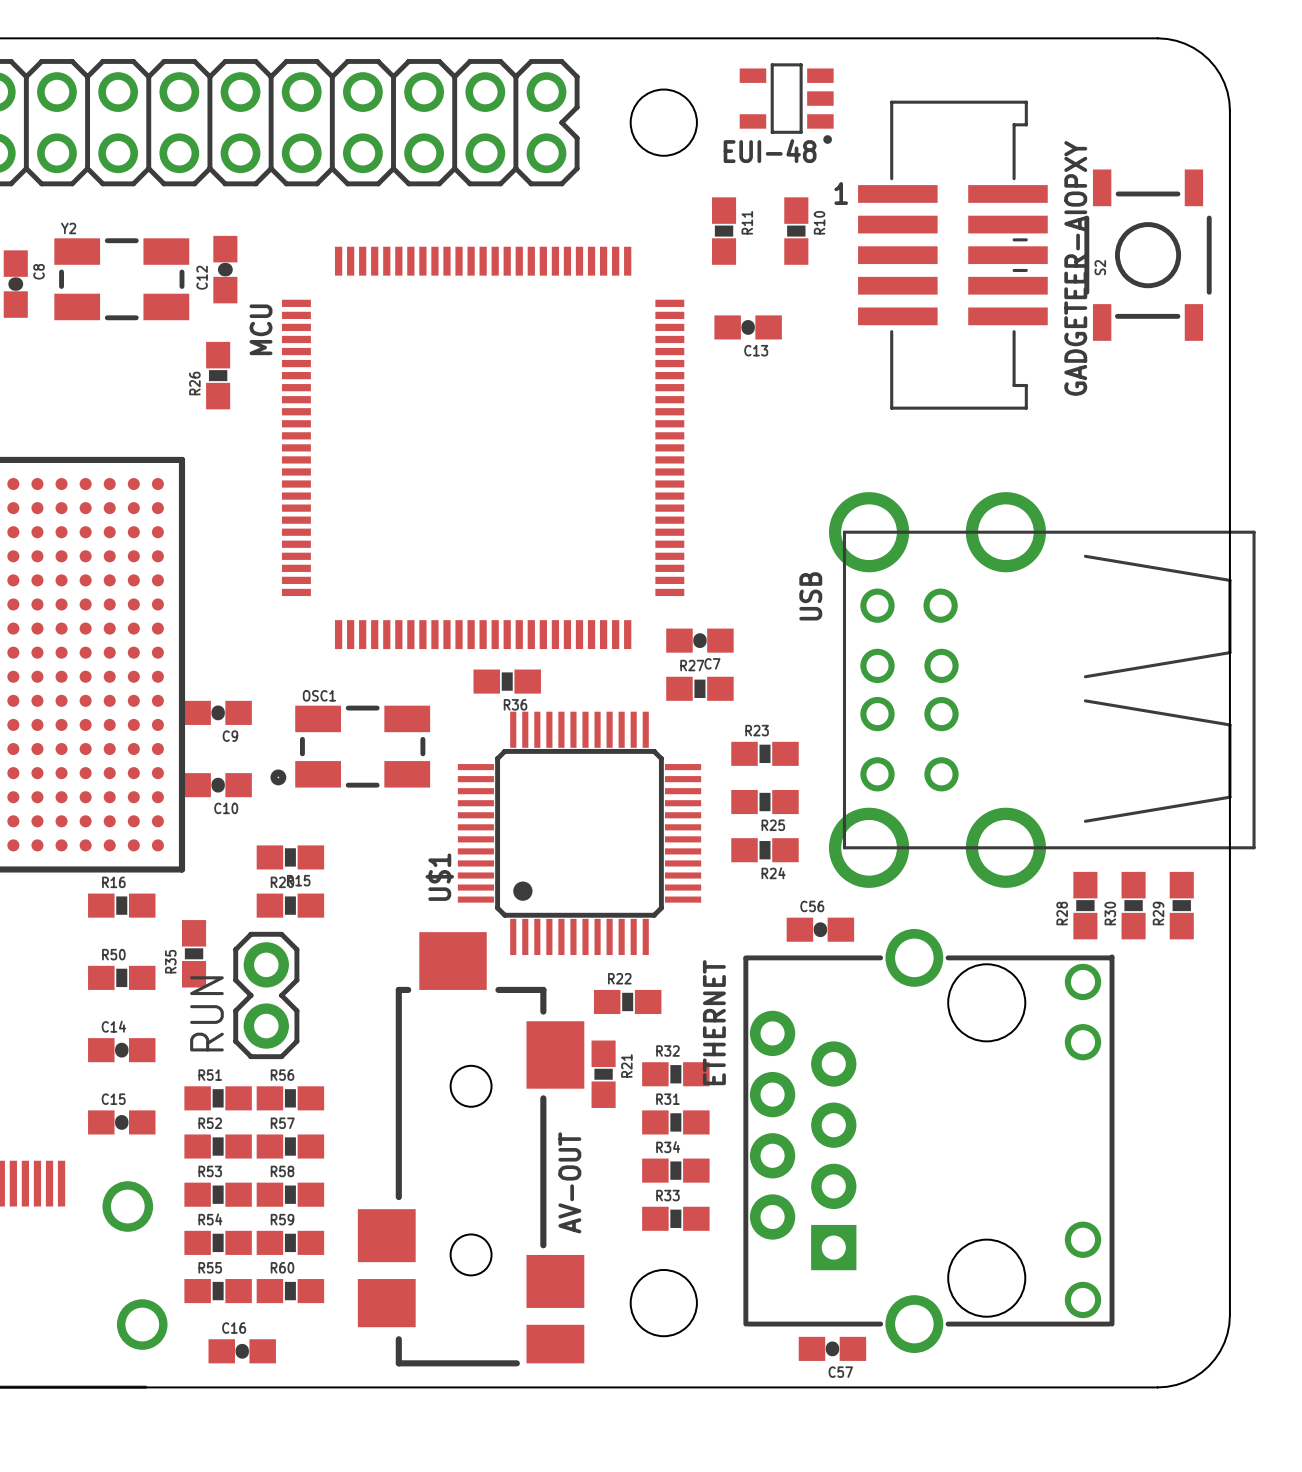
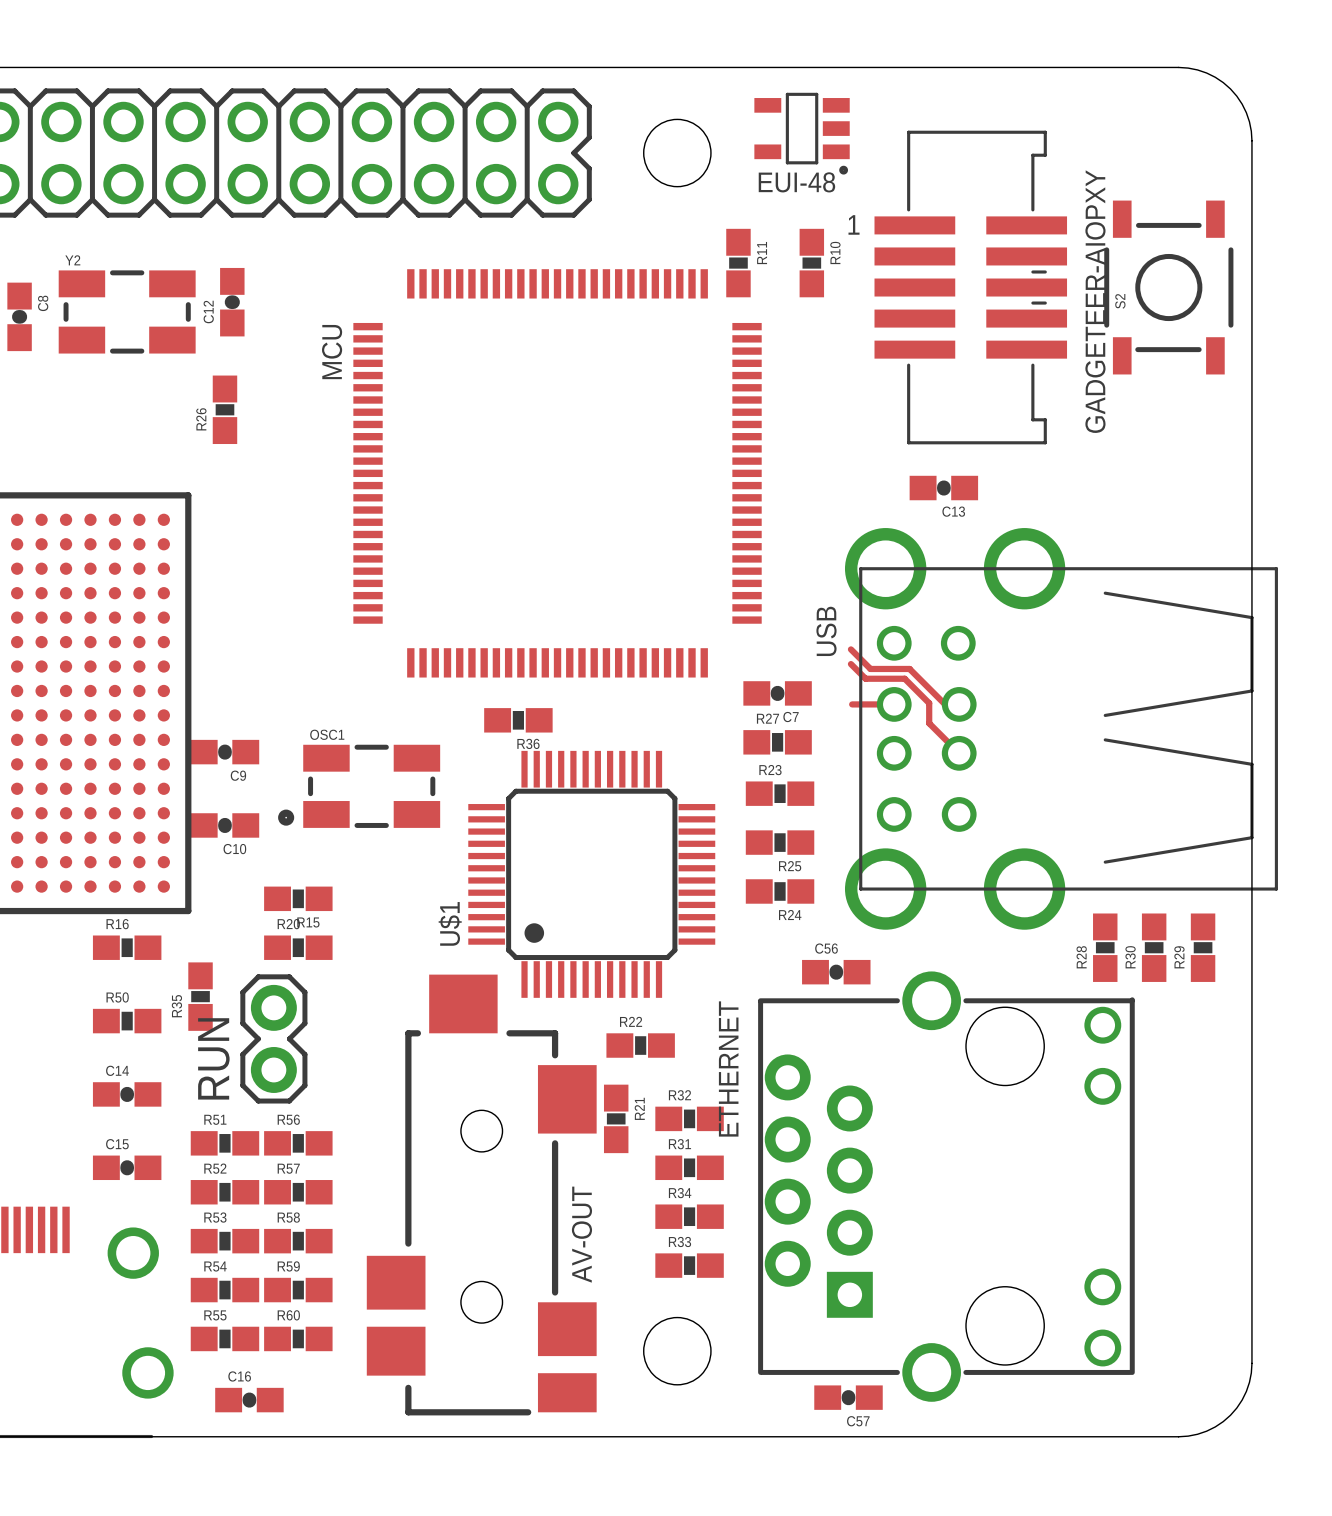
C13 position: (748, 327) -> (943, 488)
MCU position: (483, 447) -> (557, 473)
track: none -> (850, 649) (870, 668) (909, 668) (945, 704) (959, 704)
track: none -> (850, 664) (865, 678) (904, 678) (929, 703) (929, 723) (959, 753)
C7 position: (699, 640) -> (777, 693)
track: none -> (852, 704) (894, 704)
R27 position: (699, 688) -> (777, 742)

